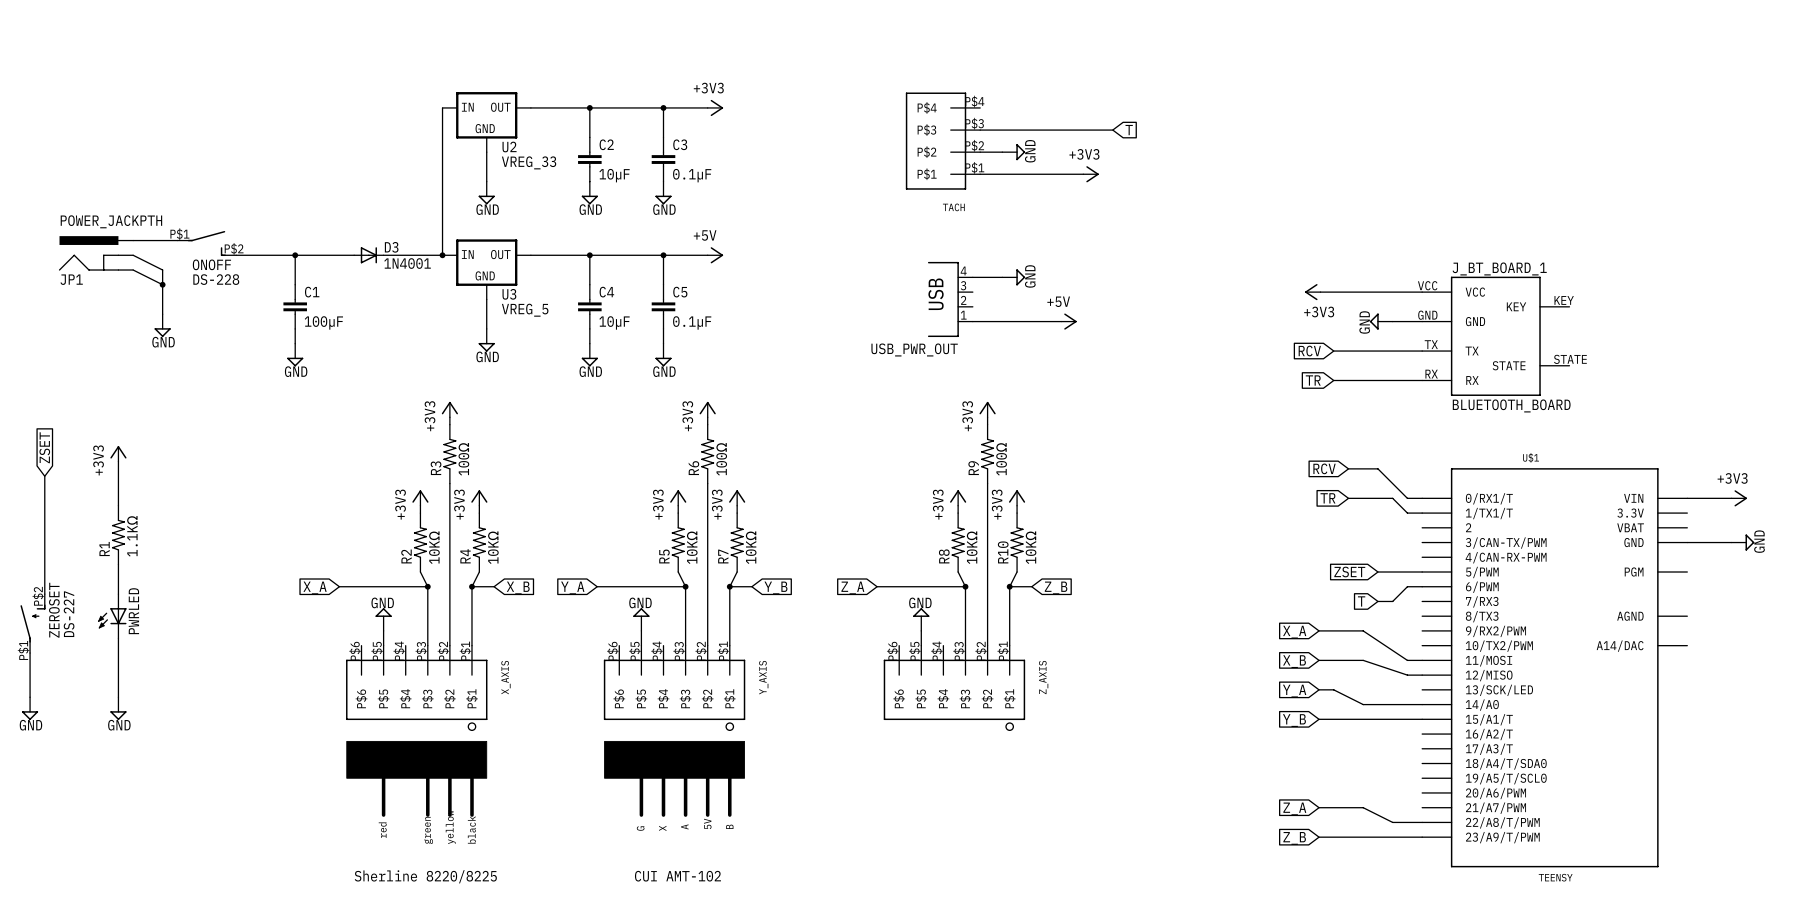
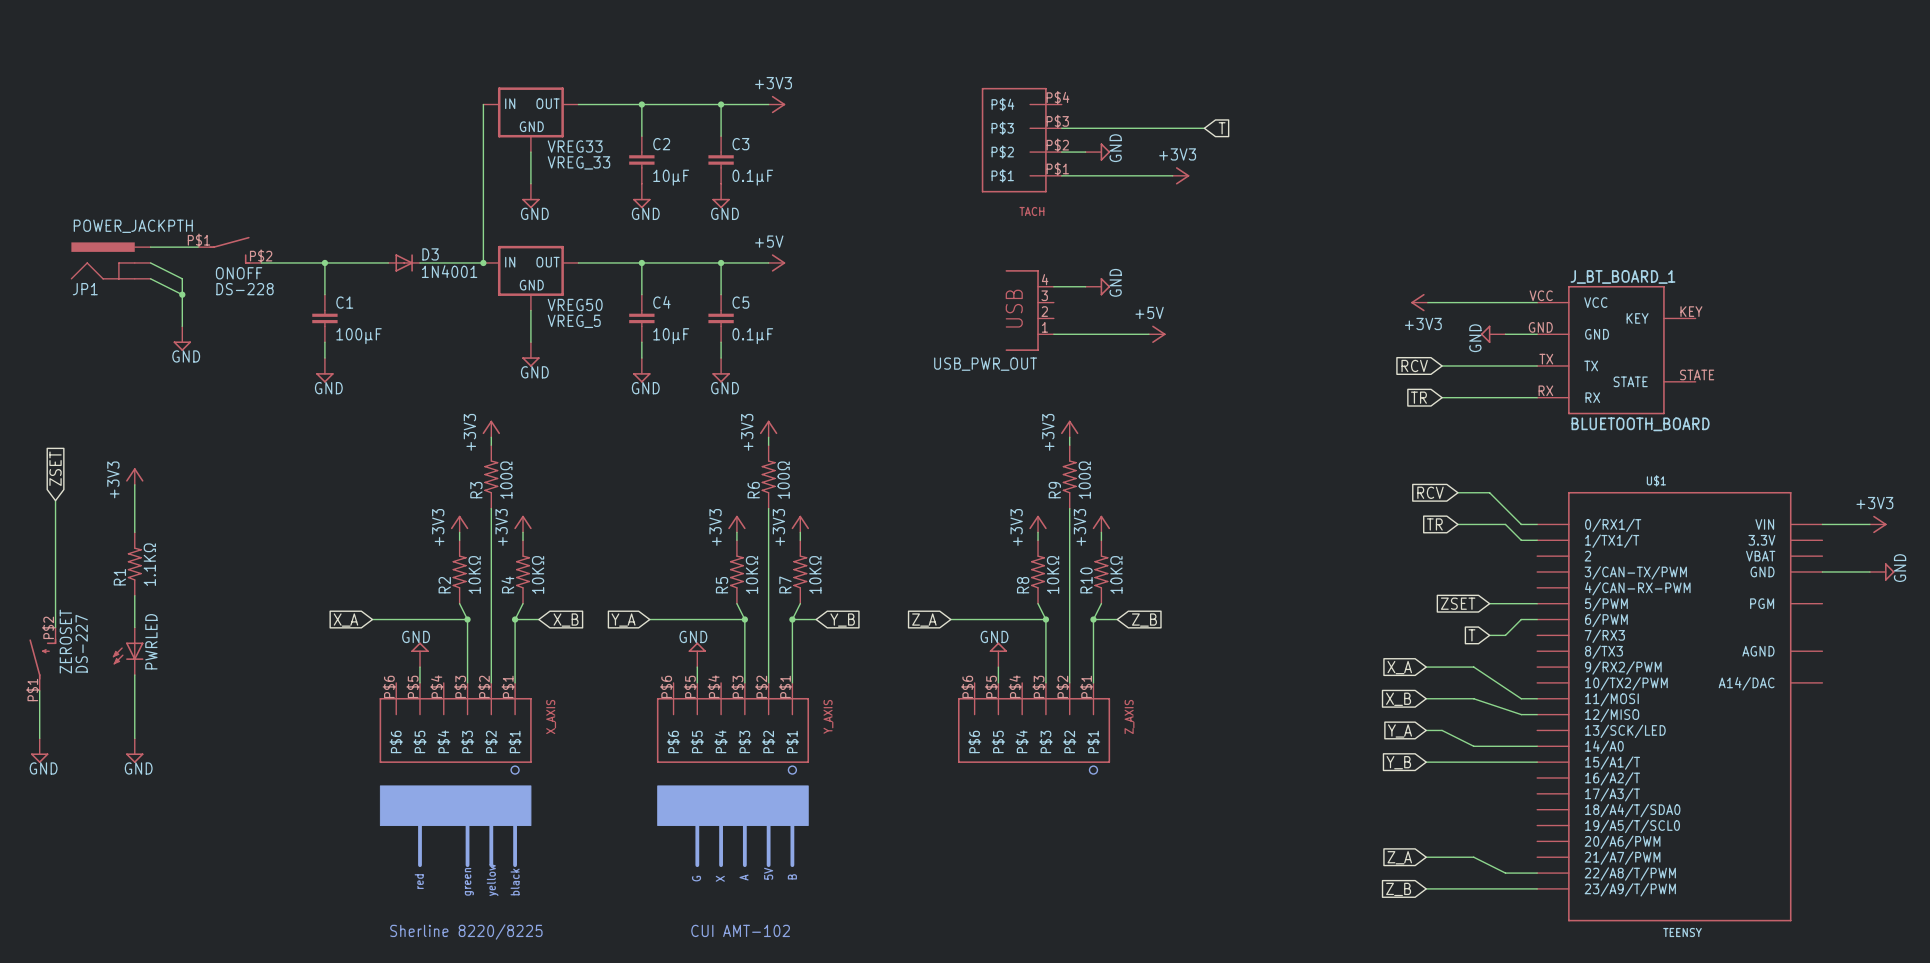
U2 name: U2 (509, 147) -> VREG33 (575, 146)
U3 name: U3 (509, 294) -> VREG50 (575, 304)

